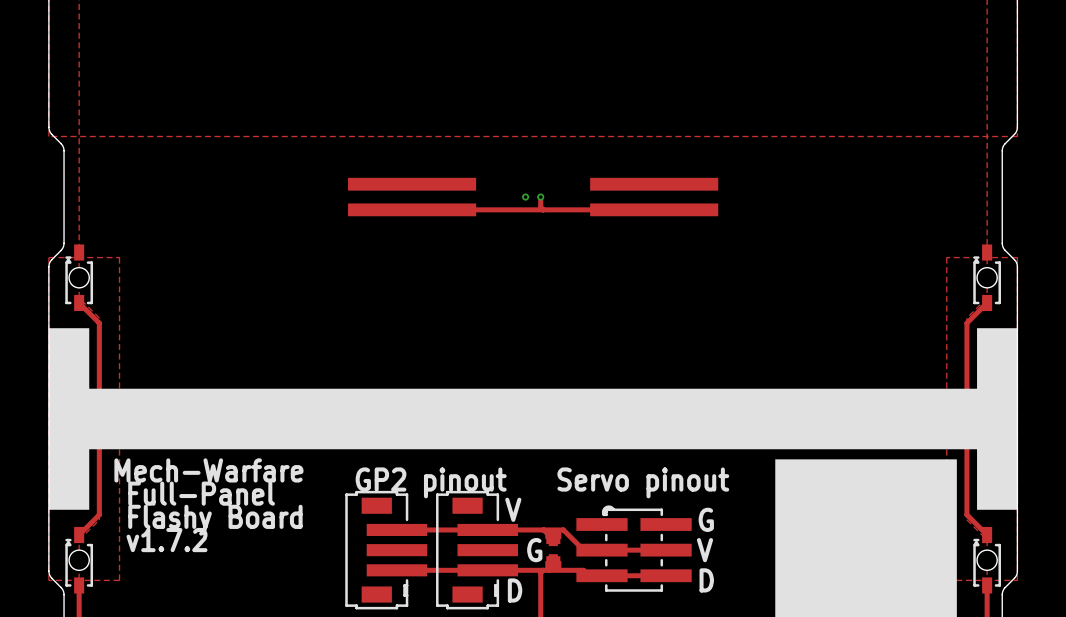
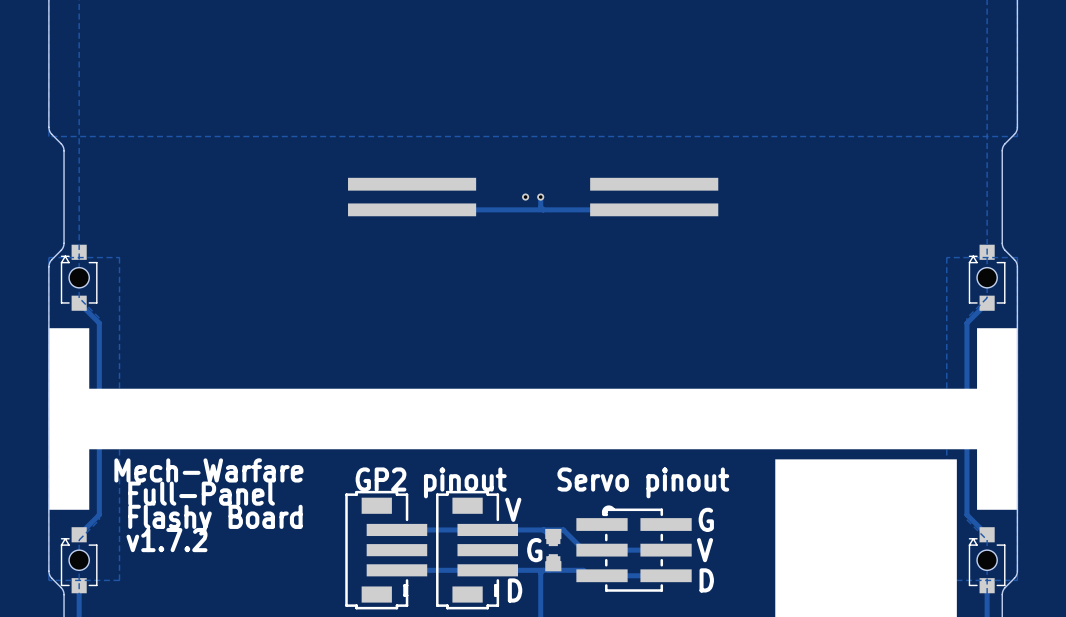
part footprint: [65, 244, 94, 312] -> [60, 244, 98, 311]
part footprint: [973, 244, 1001, 312] -> [968, 244, 1006, 311]
part footprint: [65, 526, 94, 594] -> [60, 527, 98, 594]
part footprint: [973, 526, 1001, 594] -> [968, 527, 1006, 594]

